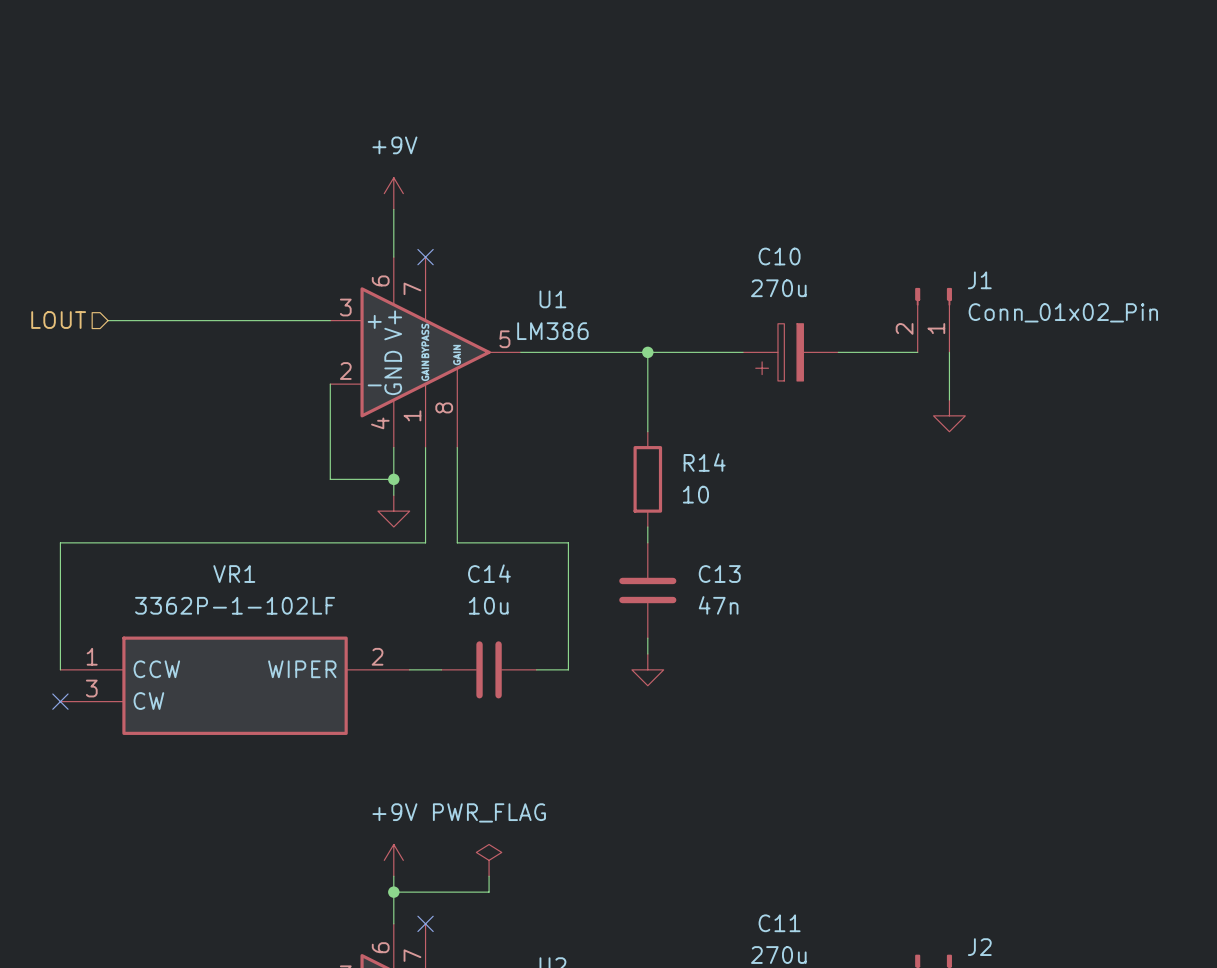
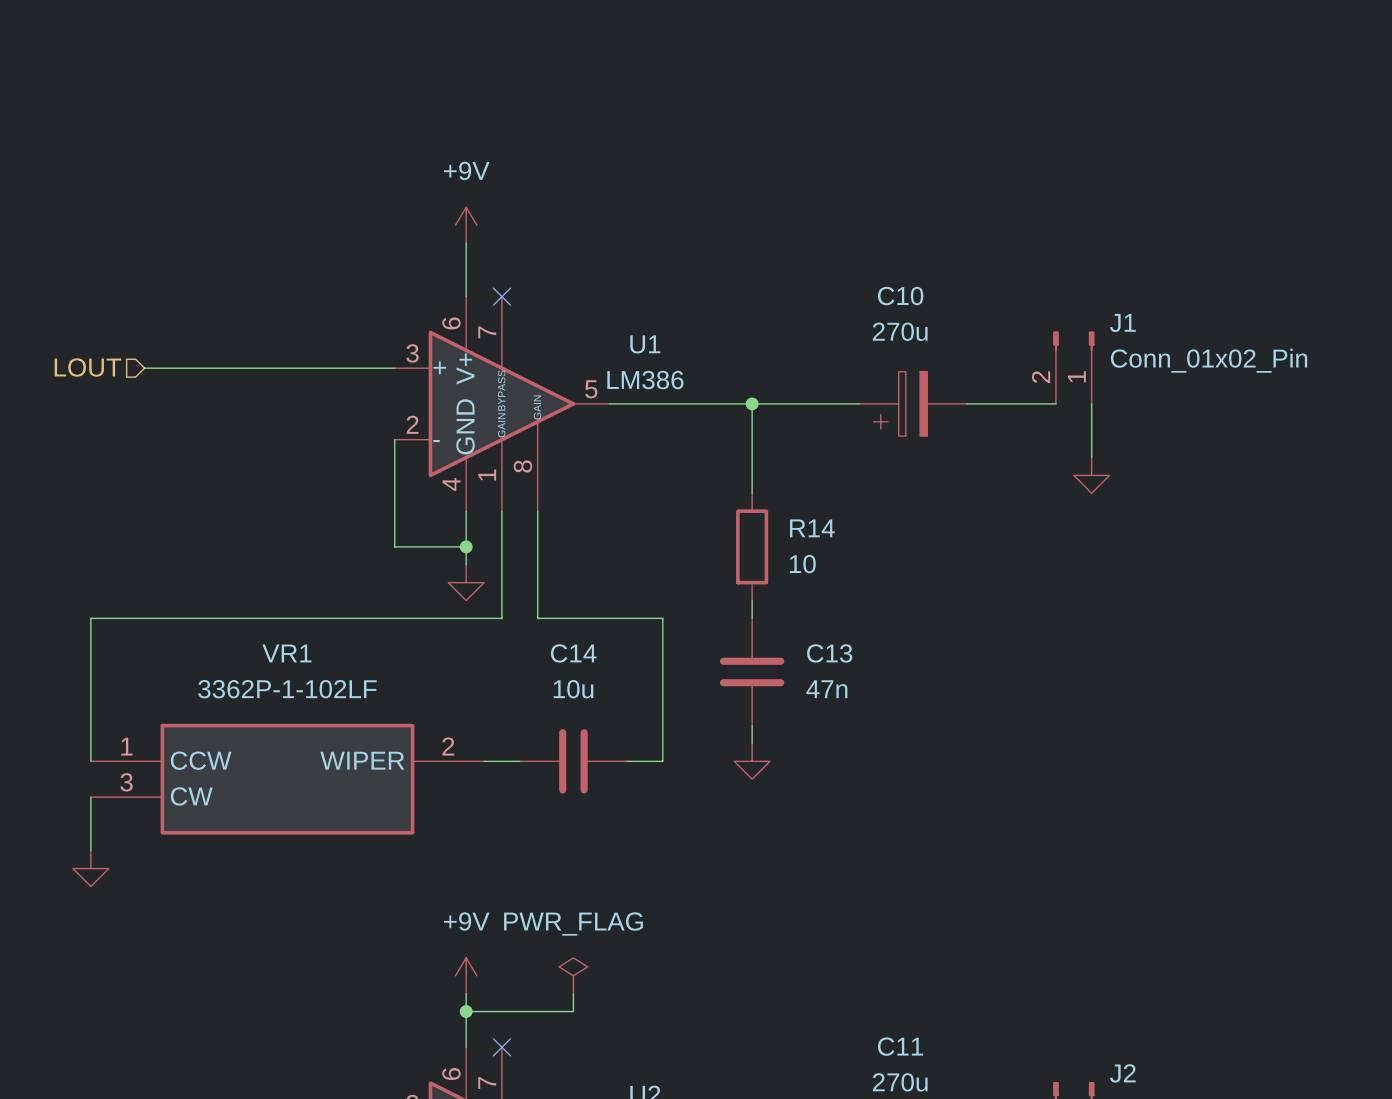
wire: none -> (90, 797) (90, 850)
no-connect mark: (60, 701) -> none
power symbol: none -> (90, 868)

